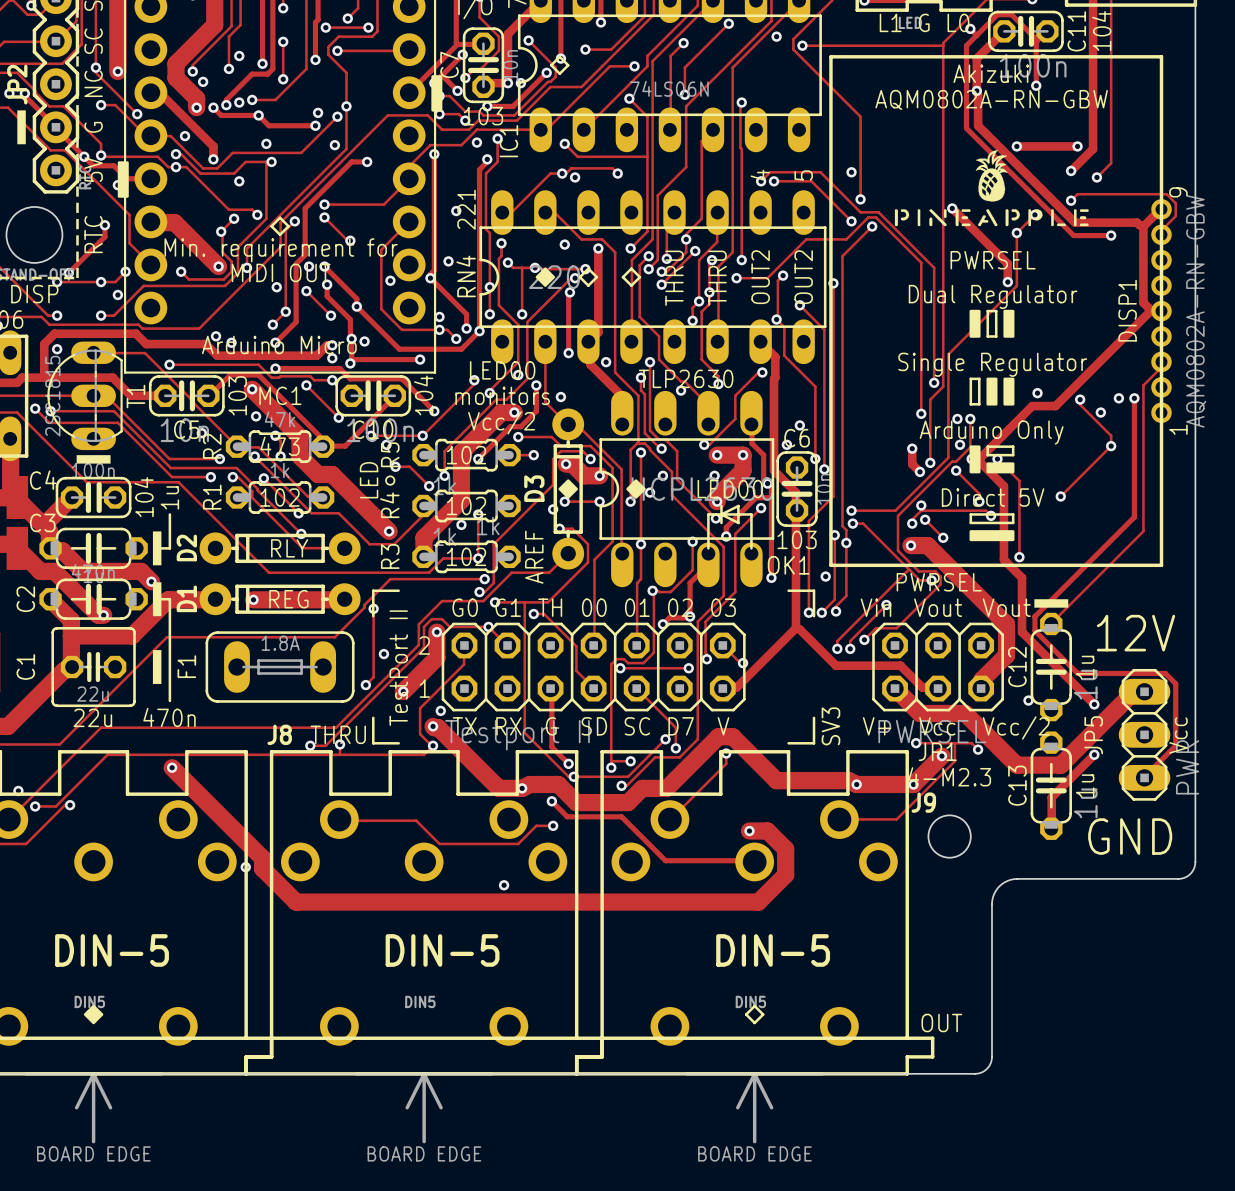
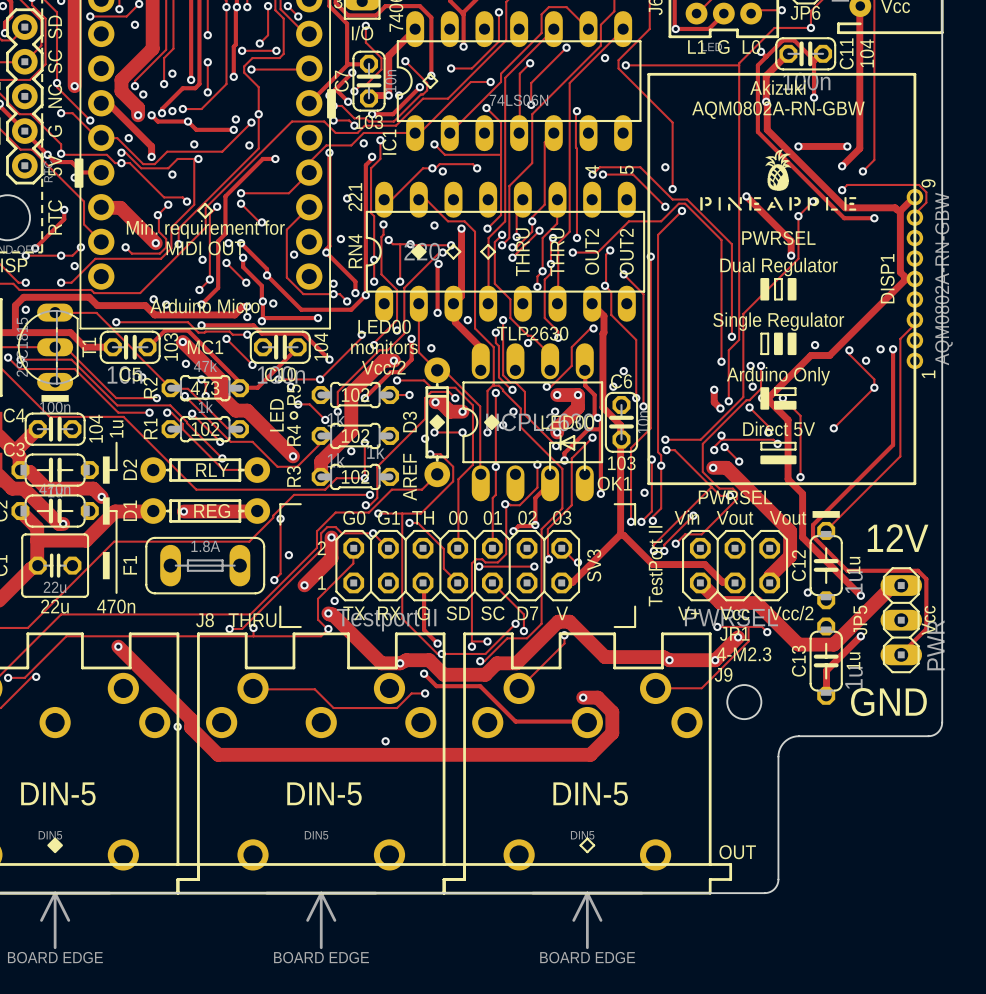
text: TestPort II (398, 668) -> none
text: none -> TestPort II (655, 566)
SV3 name position: SV3 (830, 726) -> SV3 (594, 565)

